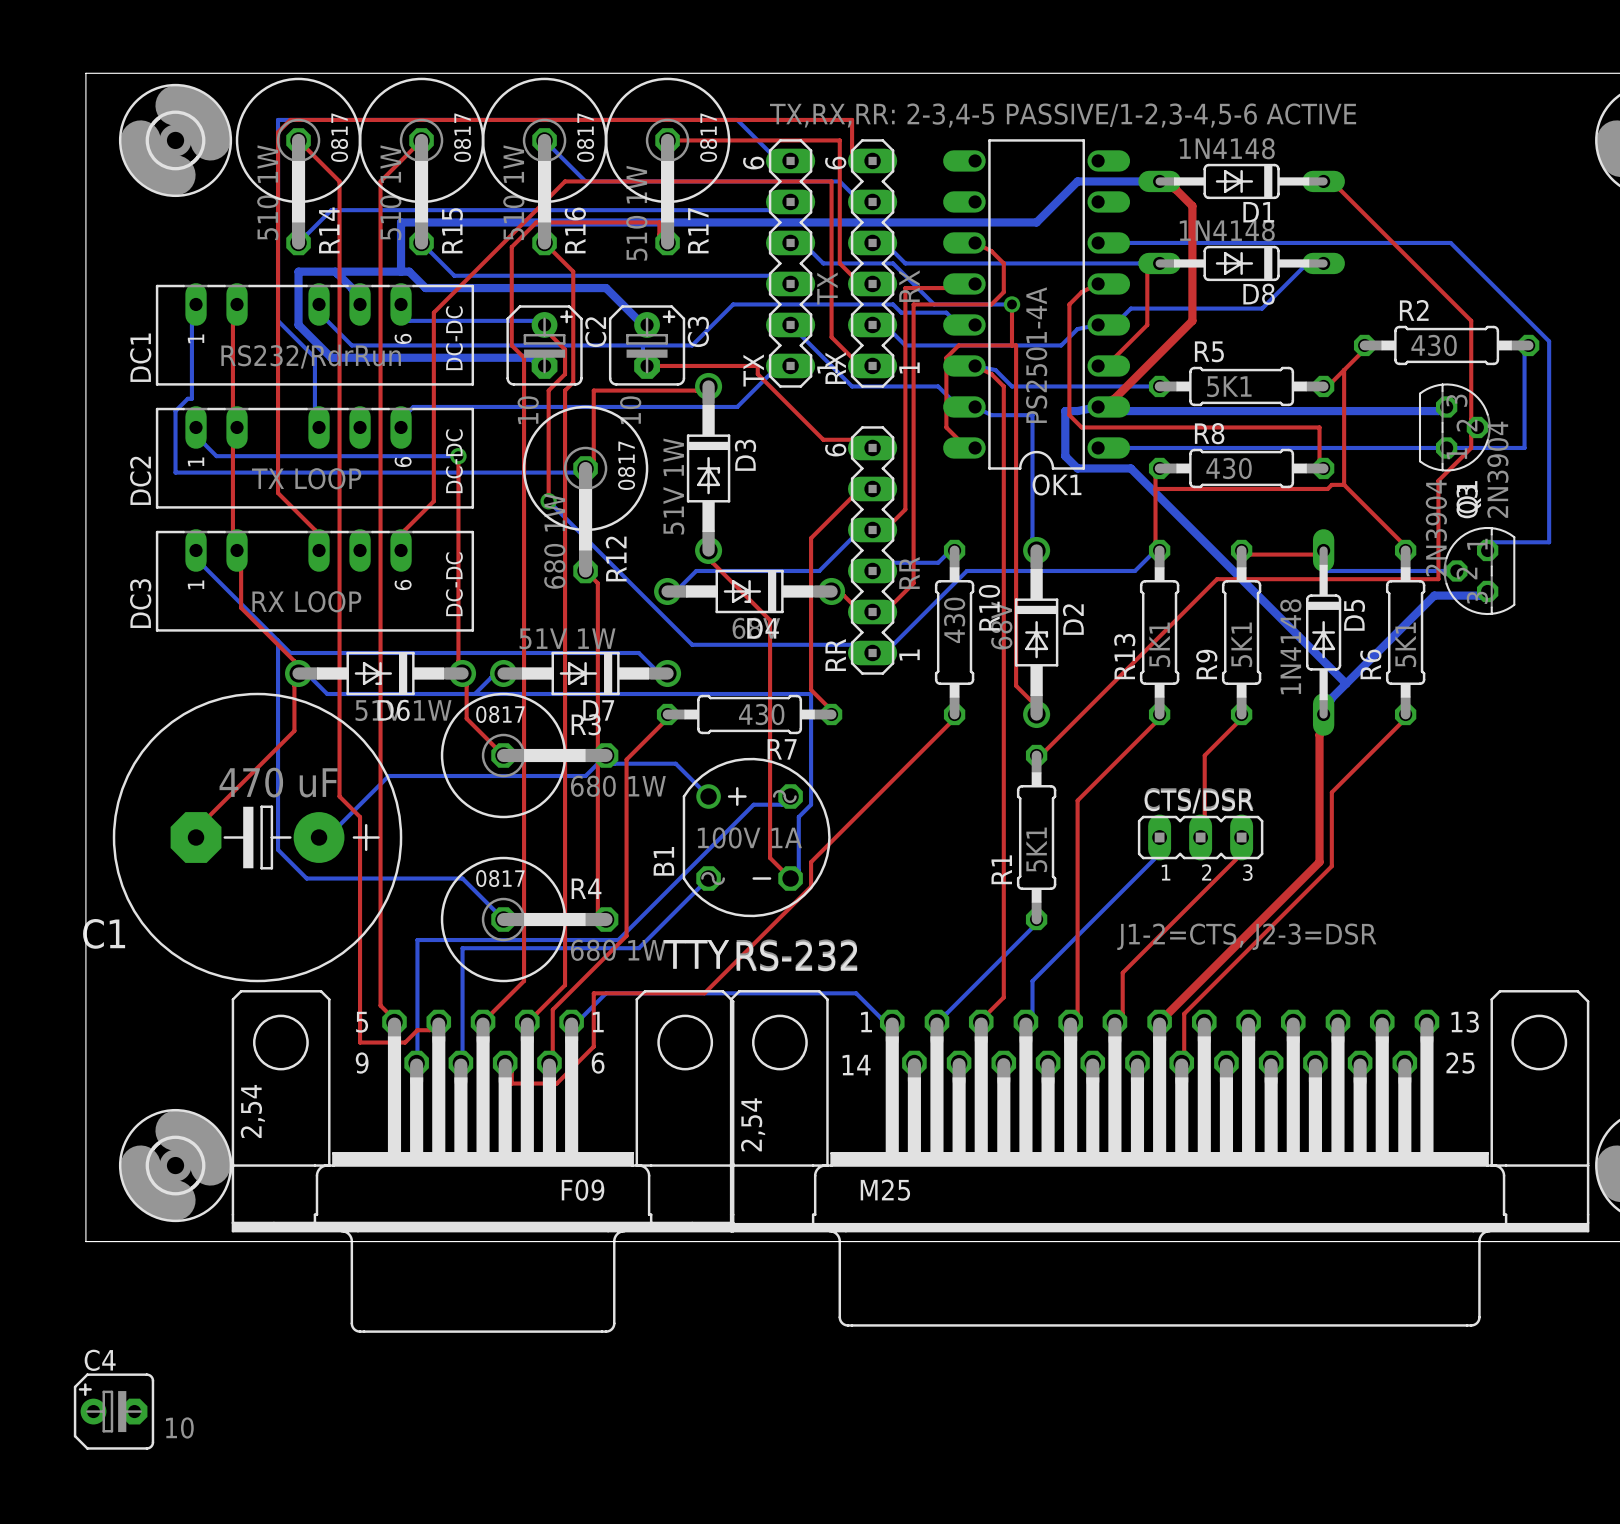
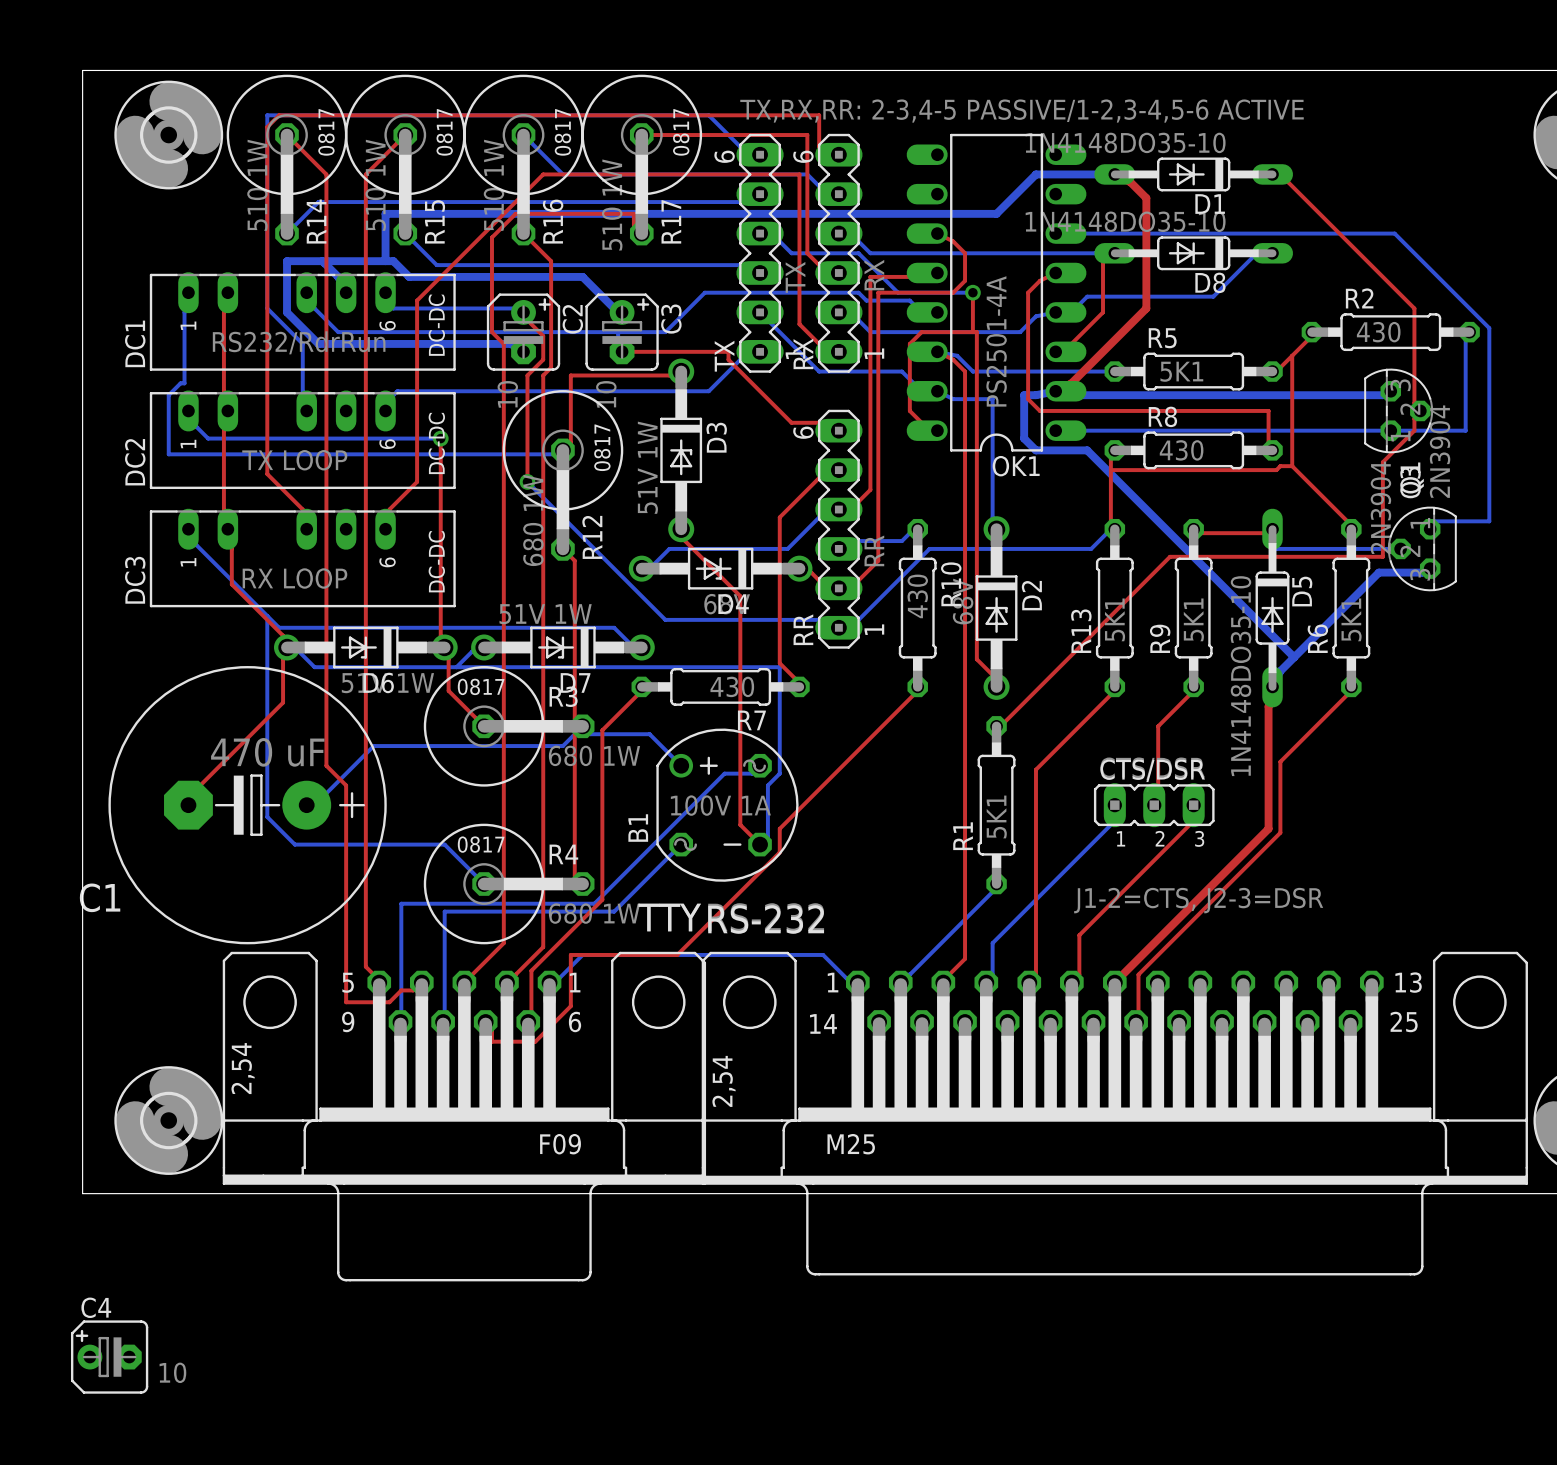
D1 value: 1N4148 (1227, 148) -> 1N4148DO35-10 (1125, 142)
D8 value: 1N4148 (1227, 230) -> 1N4148DO35-10 (1125, 221)
D5 value: 1N4148 (1290, 646) -> 1N4148DO35-10 (1240, 676)

